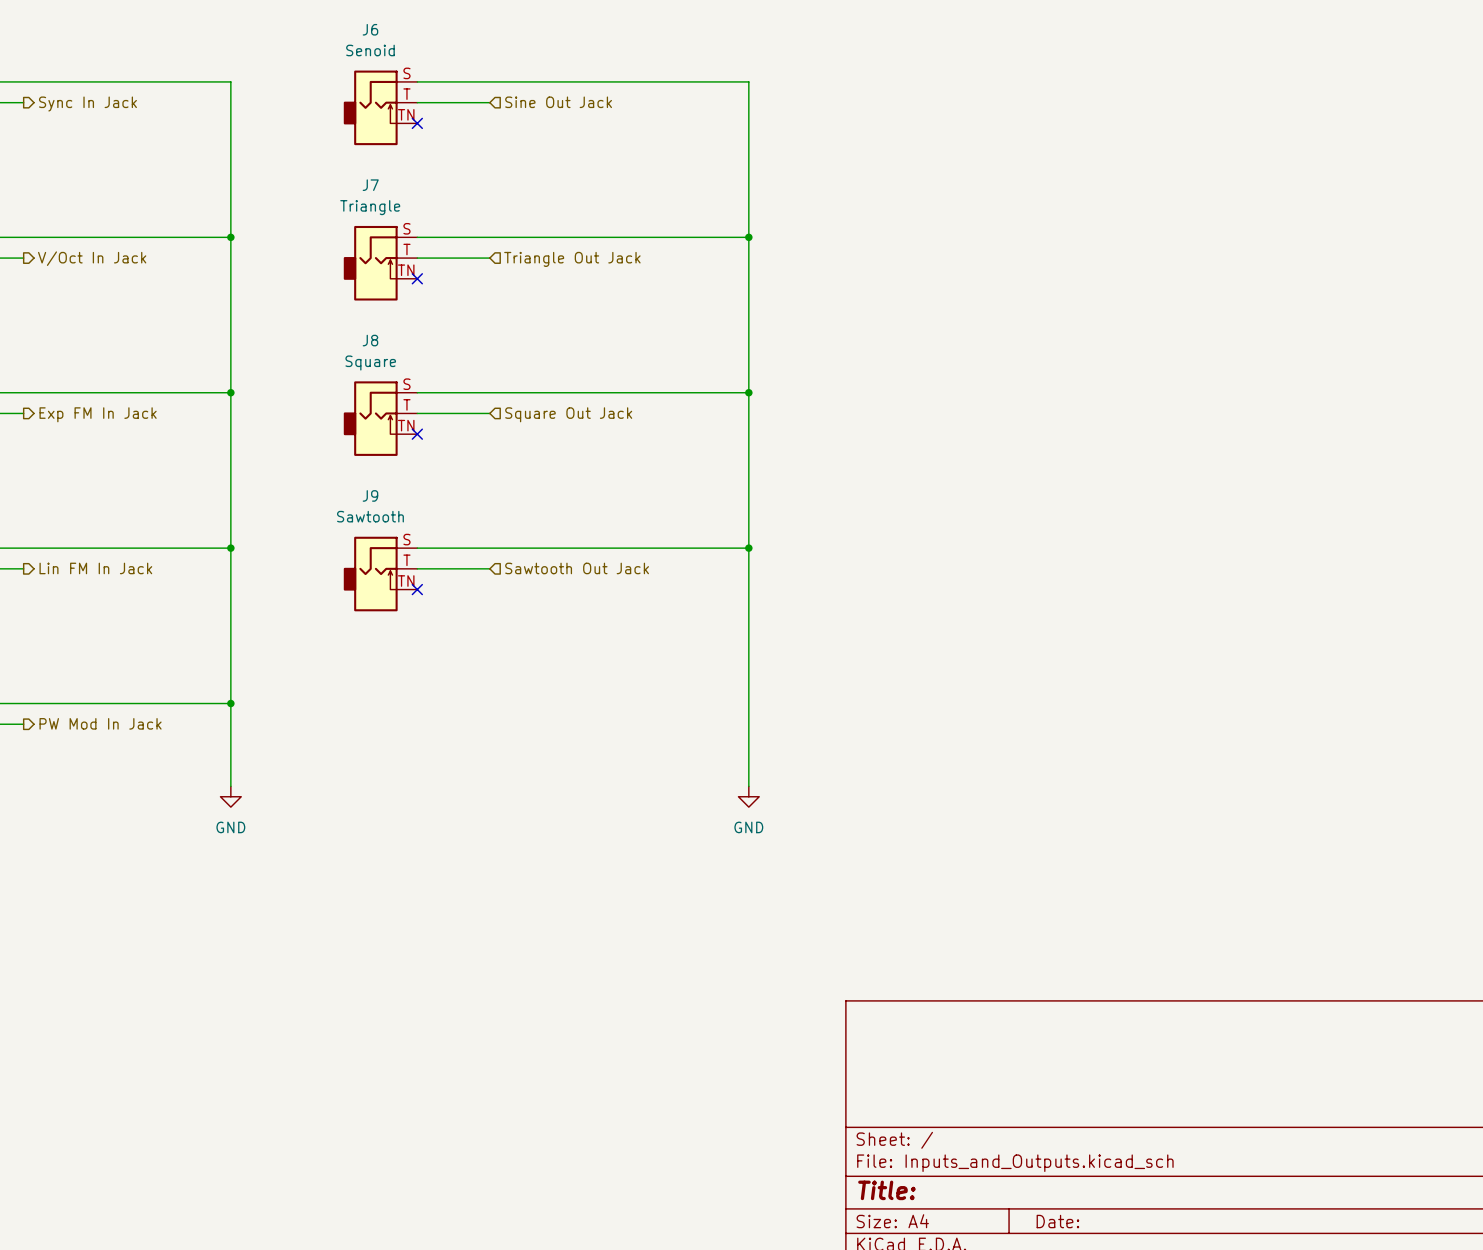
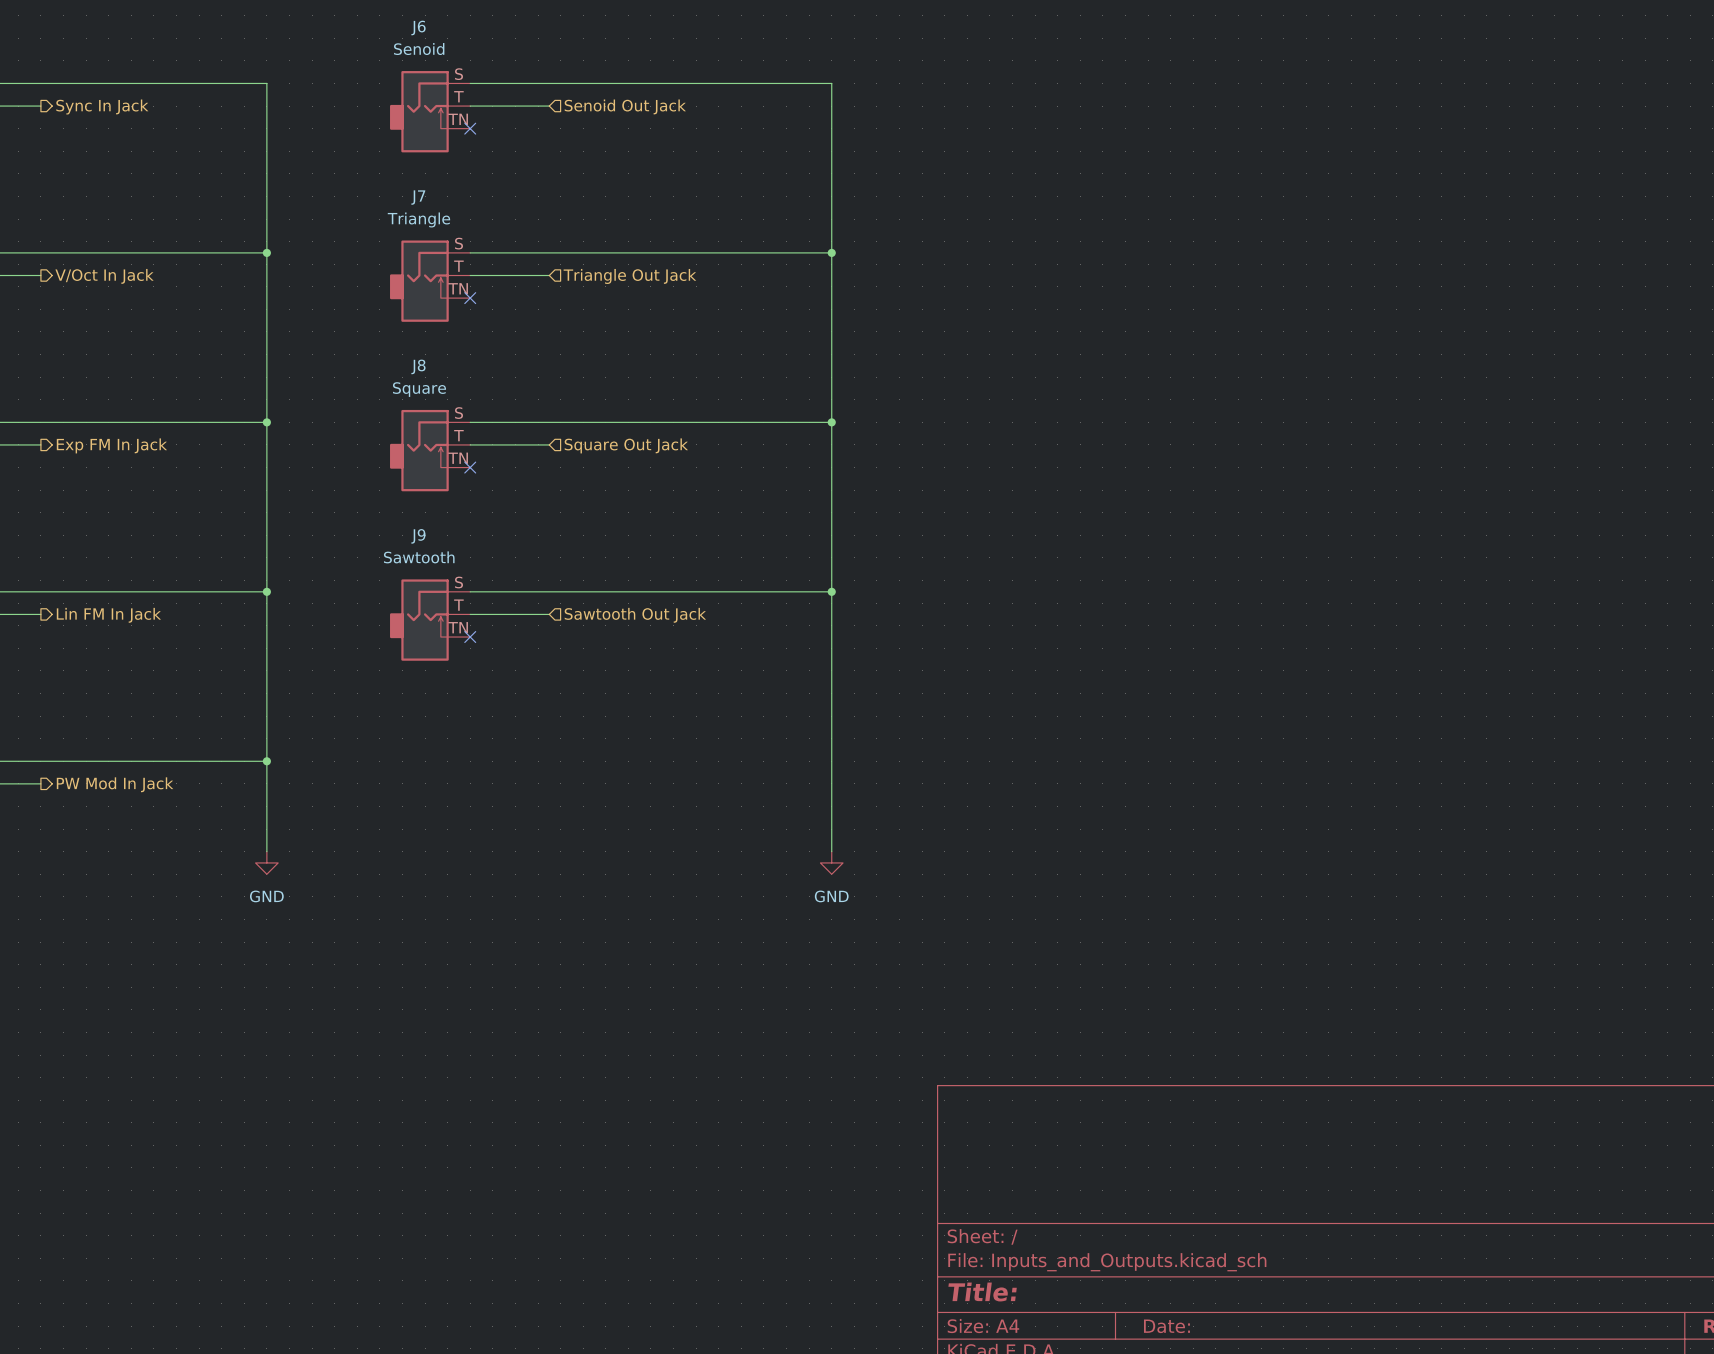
hierarchical label: Sine Out Jack (558, 102) -> Senoid Out Jack (625, 106)

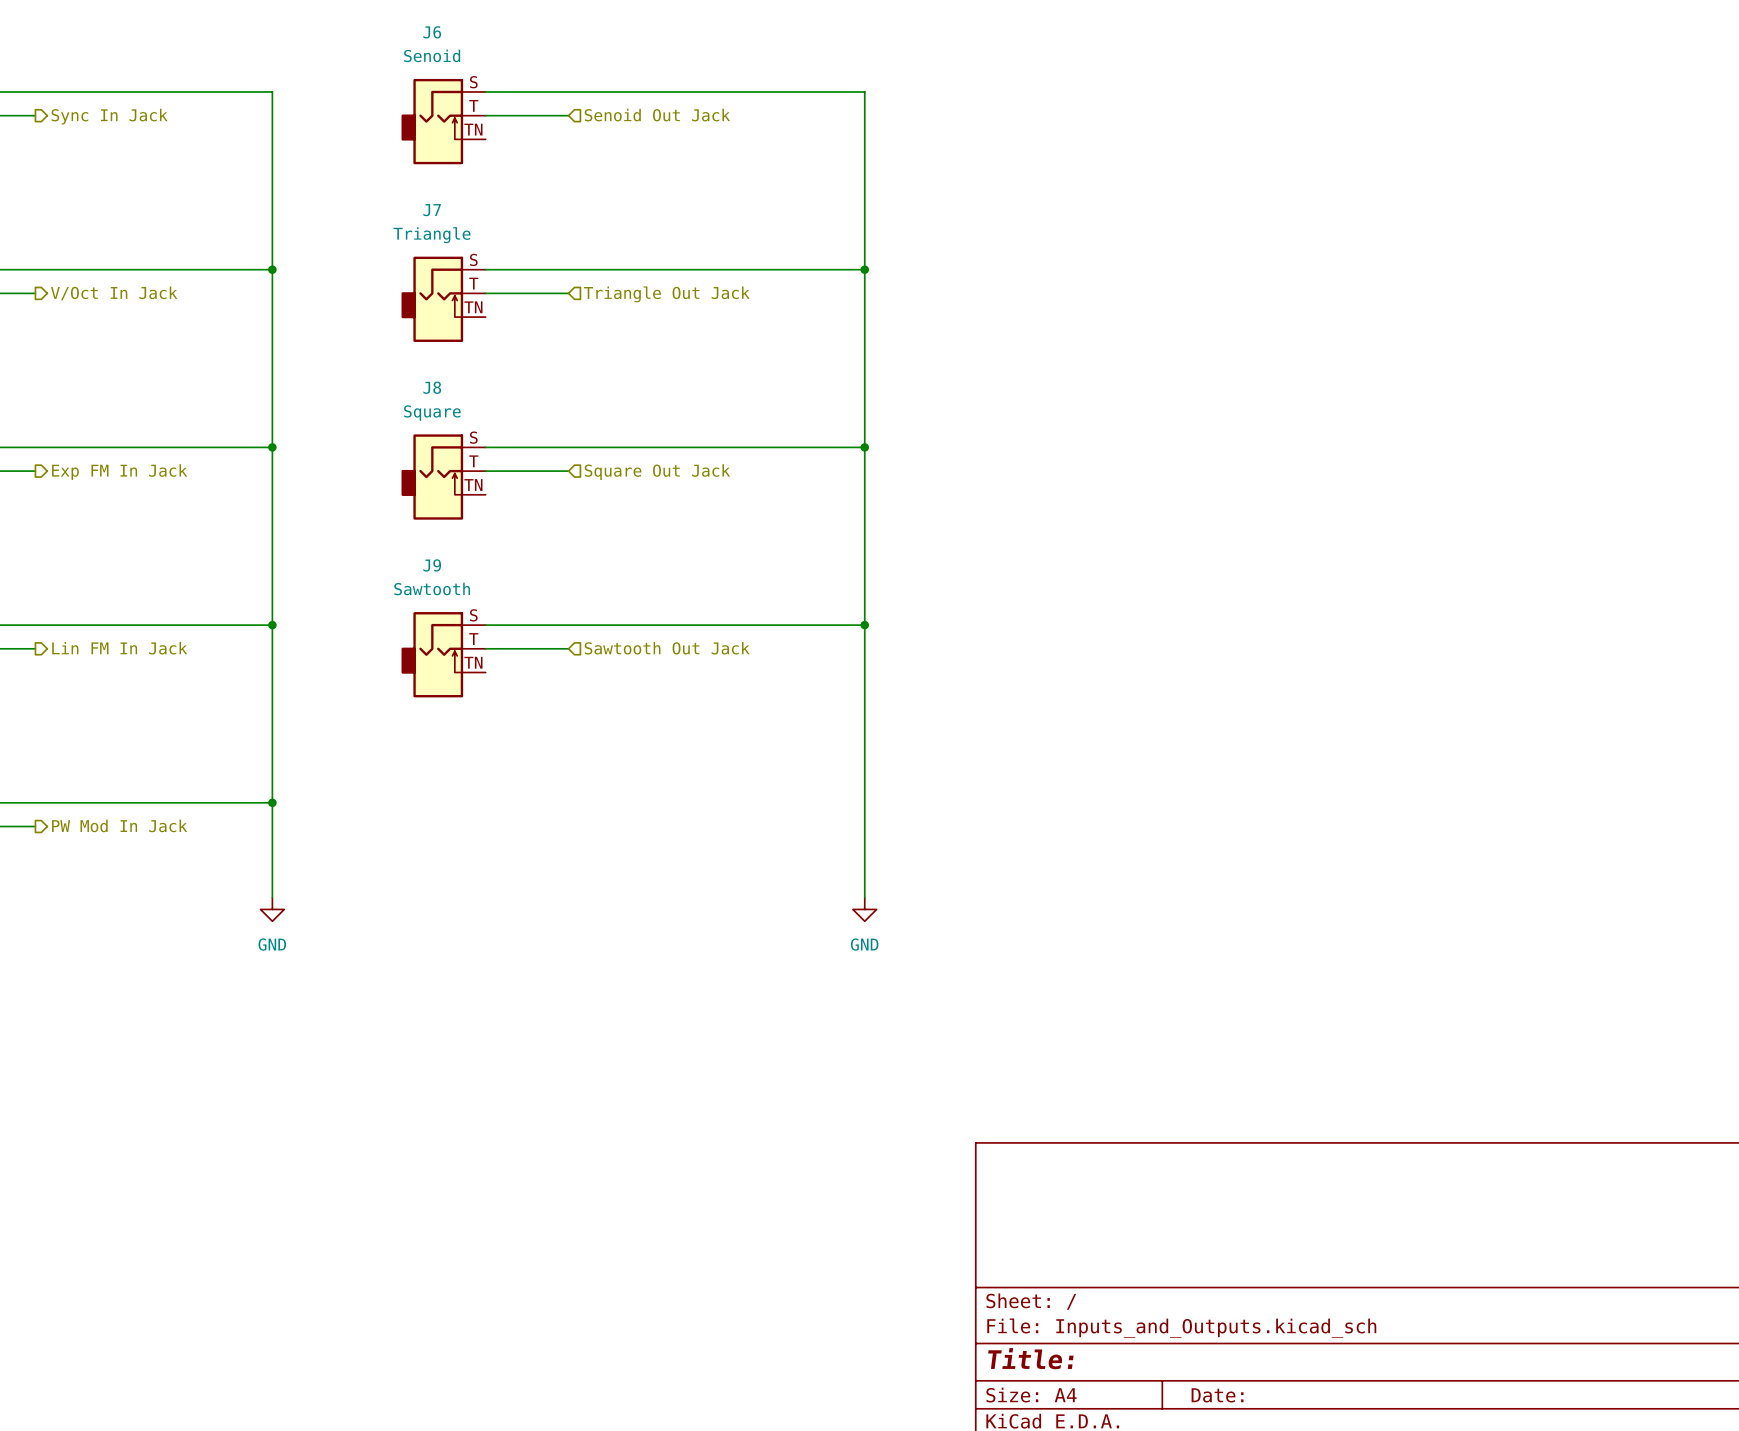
no-connect mark: (470, 128) -> none
no-connect mark: (470, 298) -> none
no-connect mark: (470, 467) -> none
no-connect mark: (470, 637) -> none

